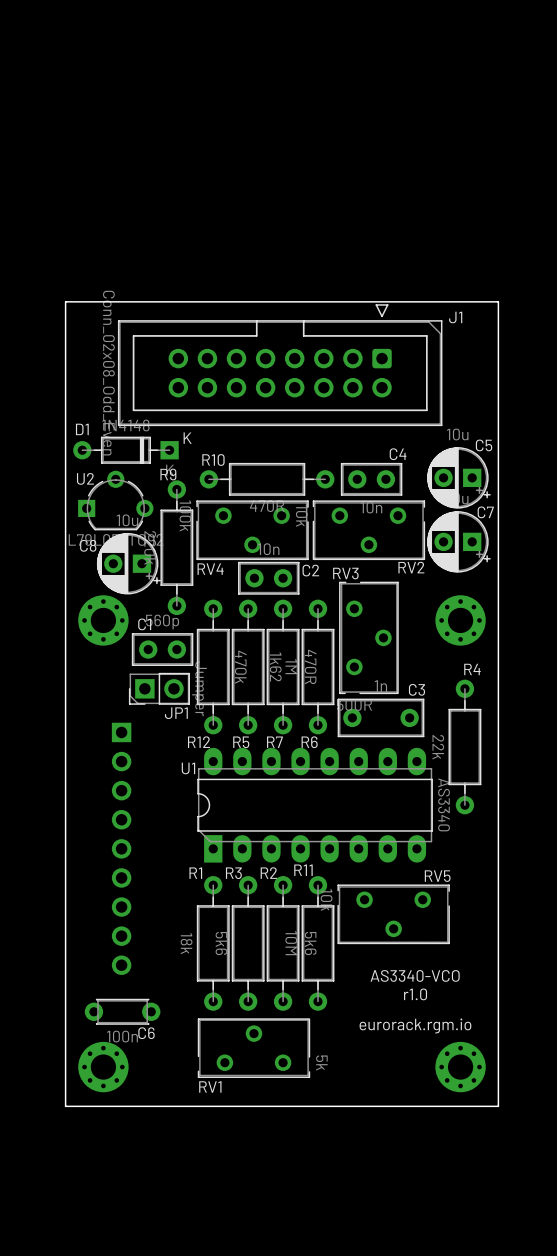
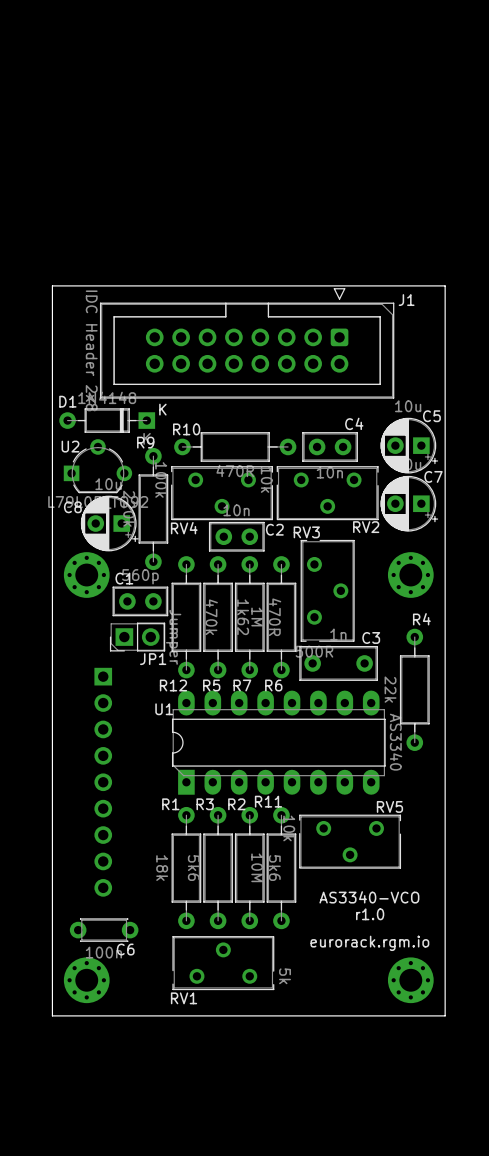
J1 value: Conn_02x08_Odd_Even (108, 373) -> IDC Header 2x8 (91, 350)

